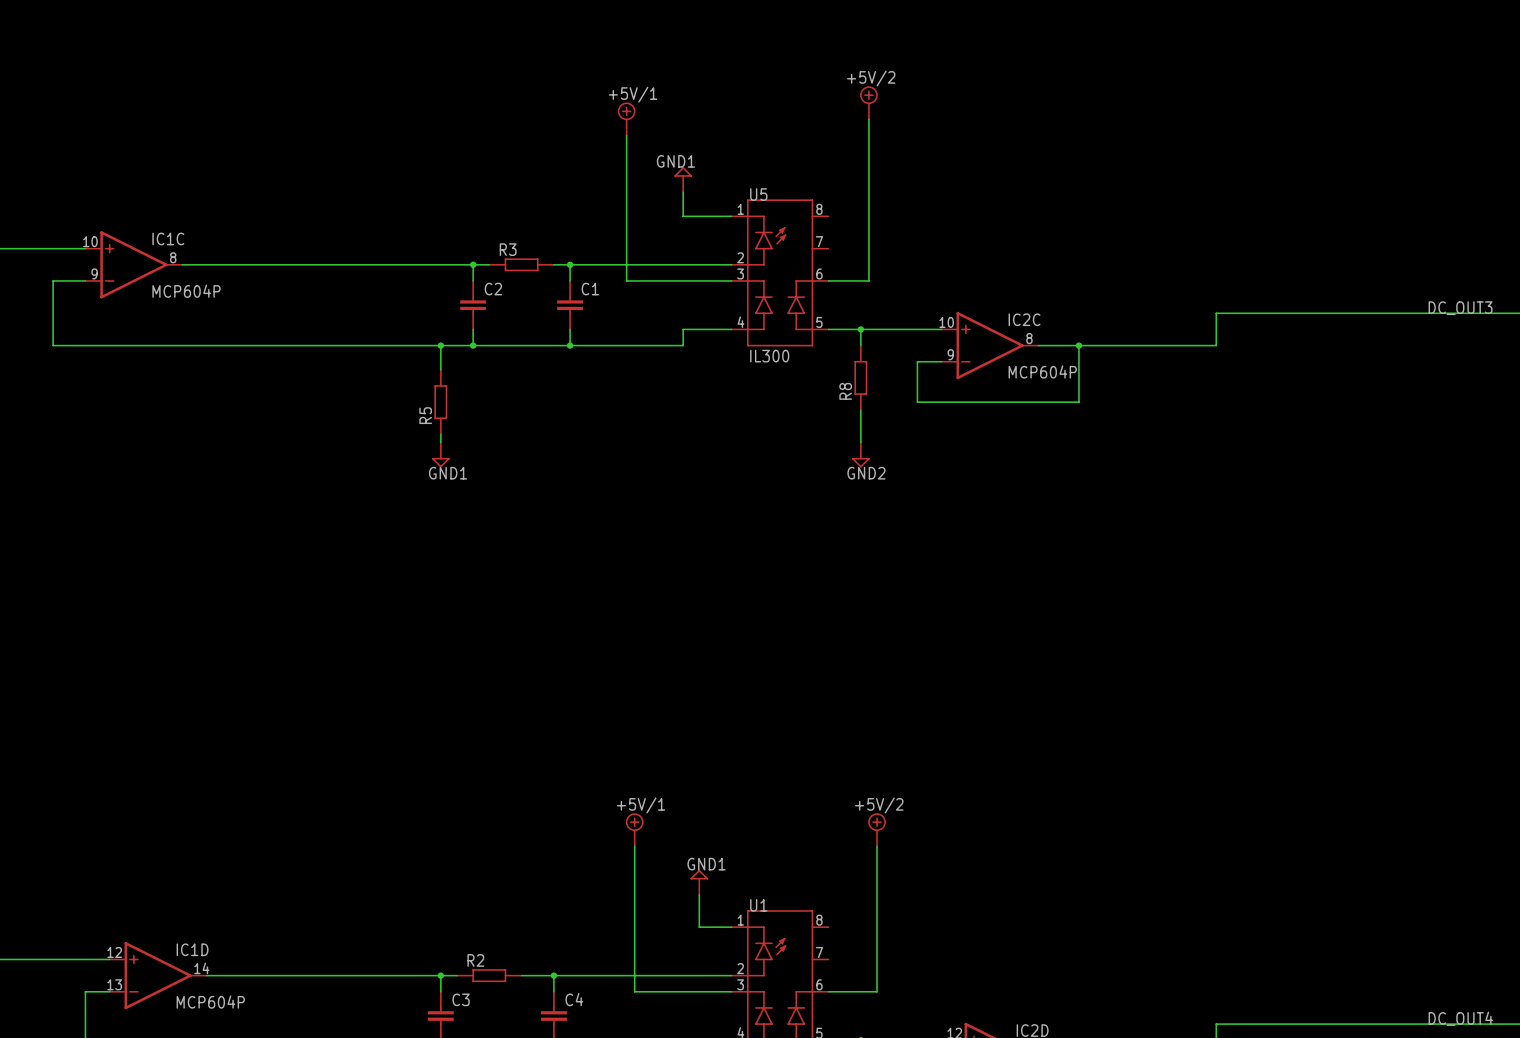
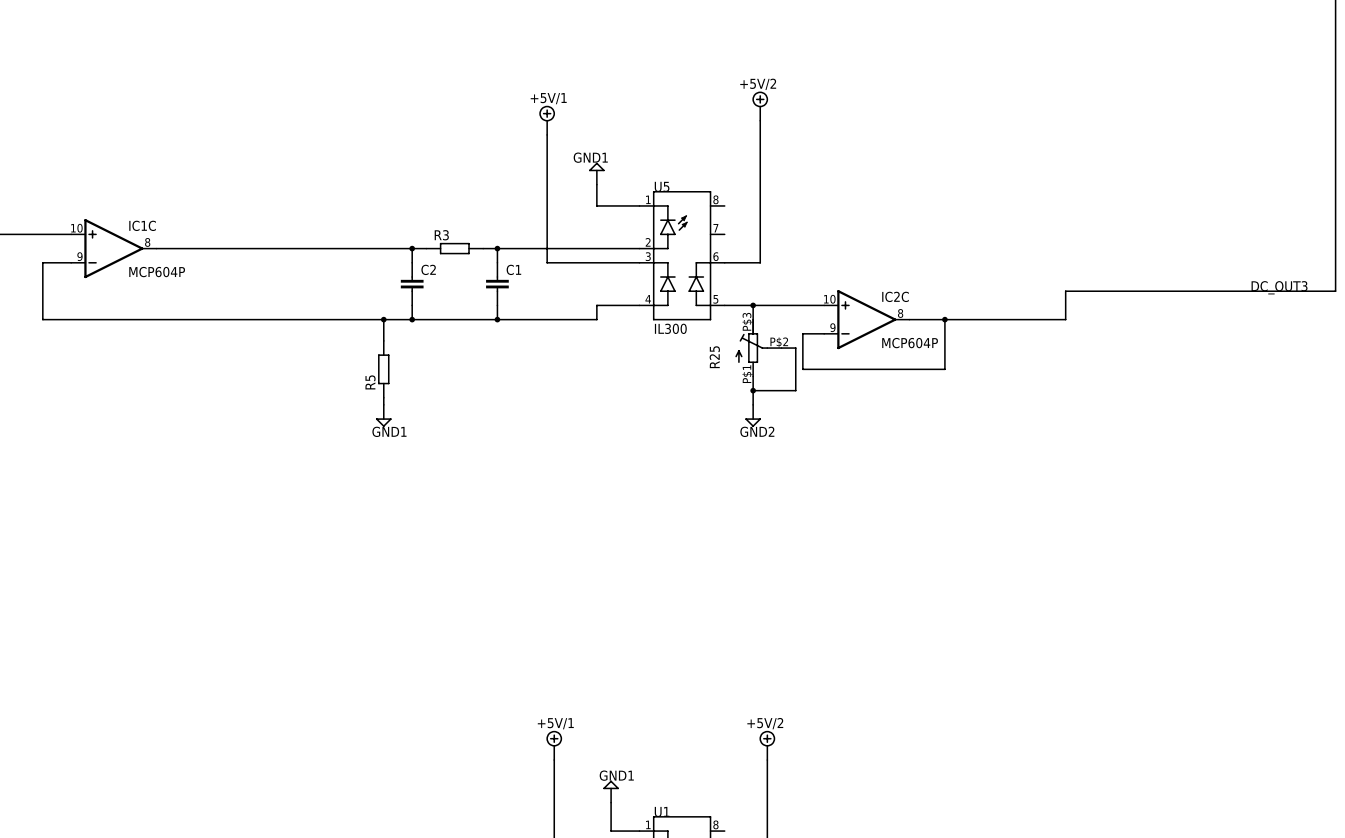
R8: (860, 377) -> none
R25: none -> (758, 347)
wire: none -> (781, 348) (795, 348) (795, 390) (753, 390)
junction: none -> (753, 390)

